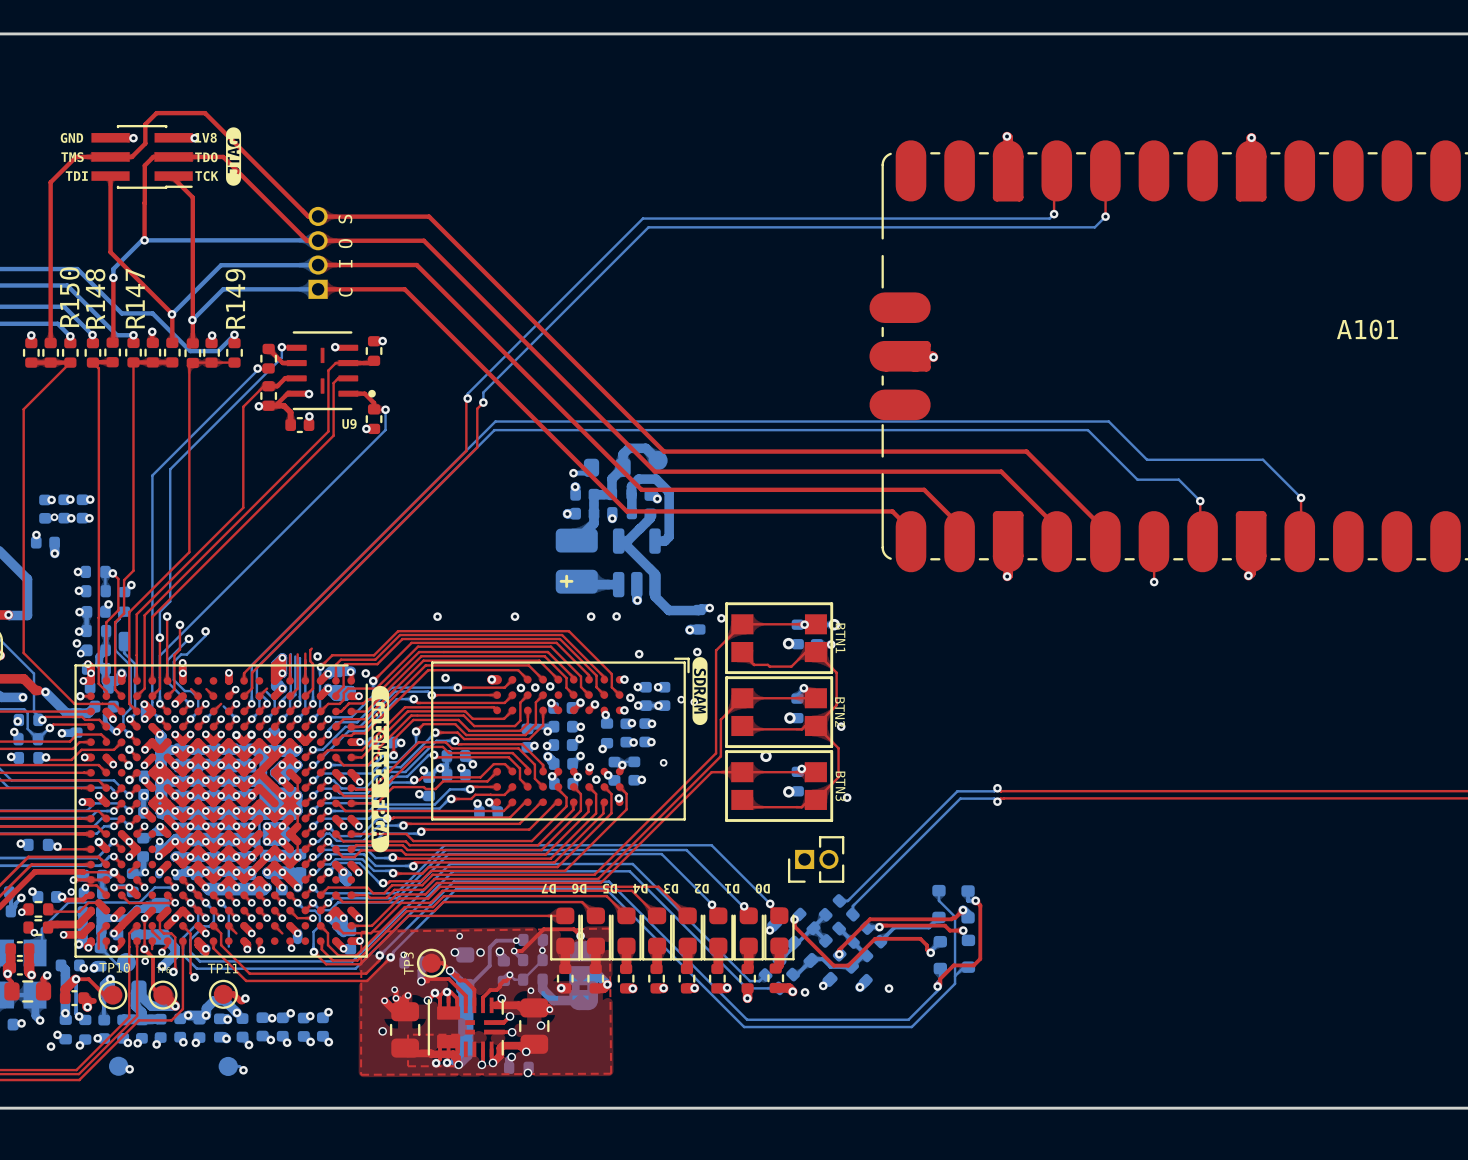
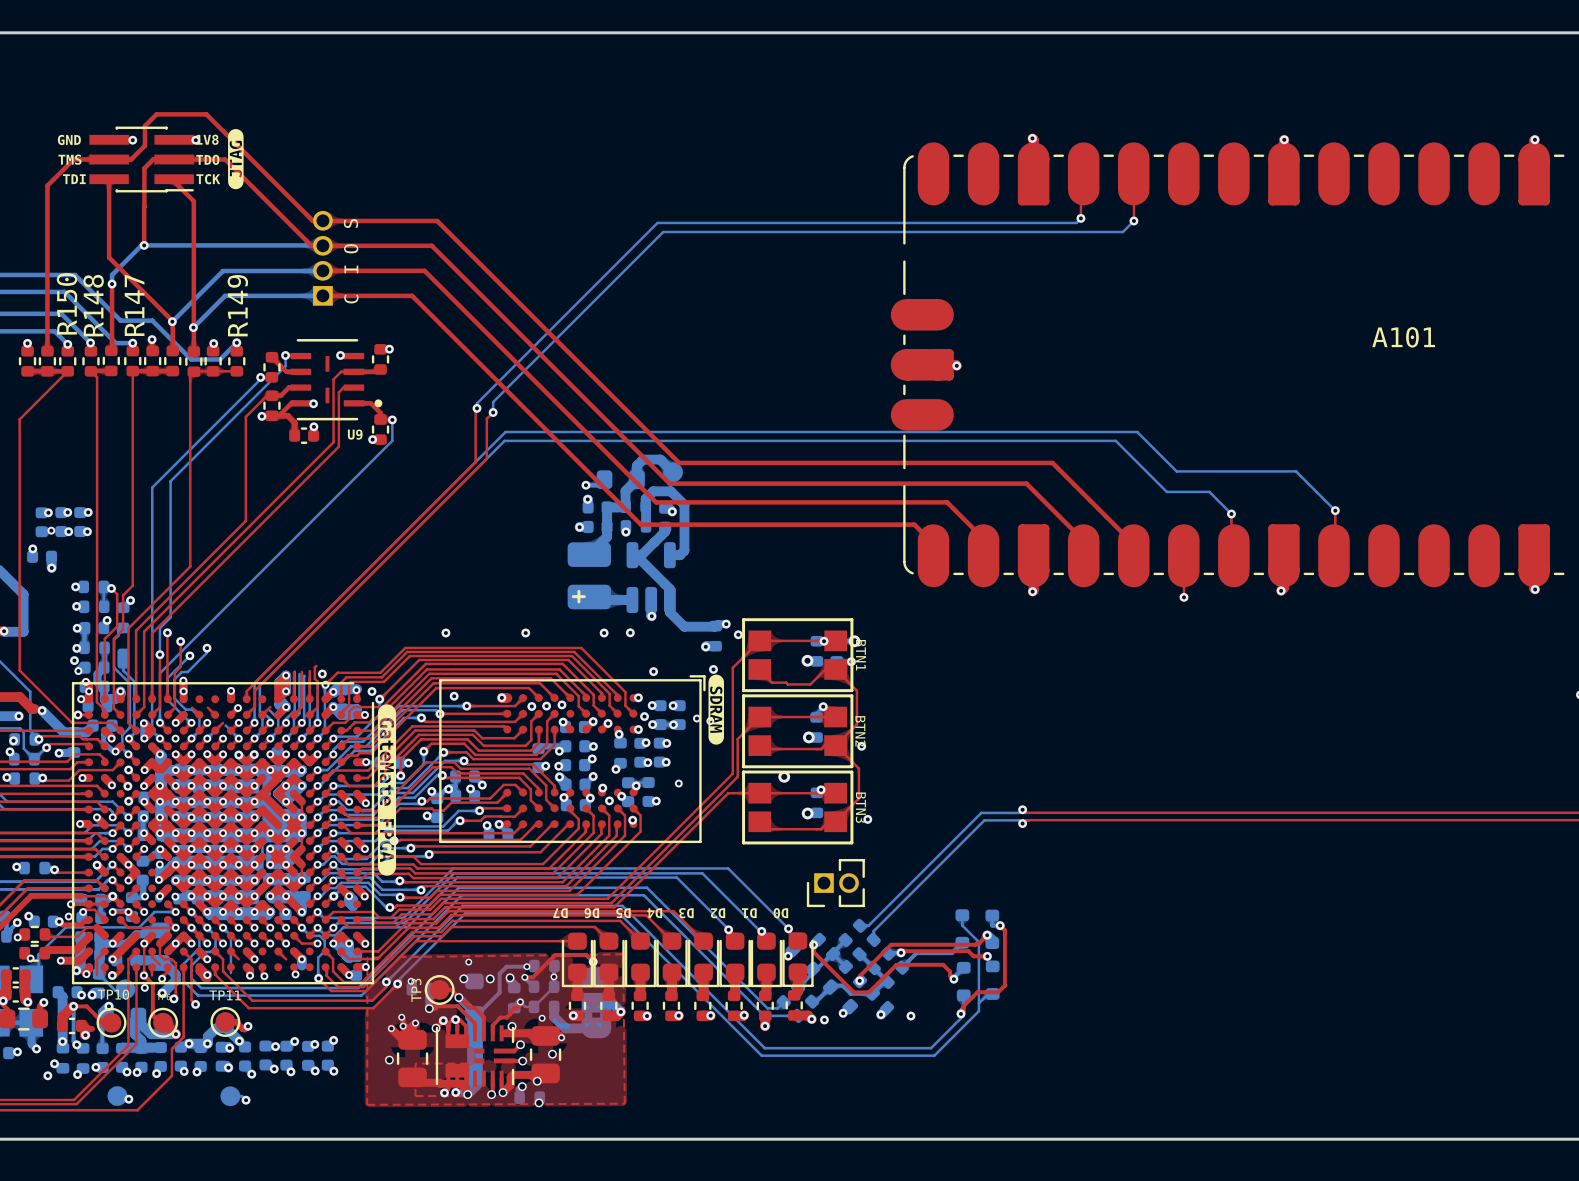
top track: (171, 1020) (138, 1020) (79, 1080) -> (171, 1048) (171, 1075) (137, 1110) (76, 1110)

